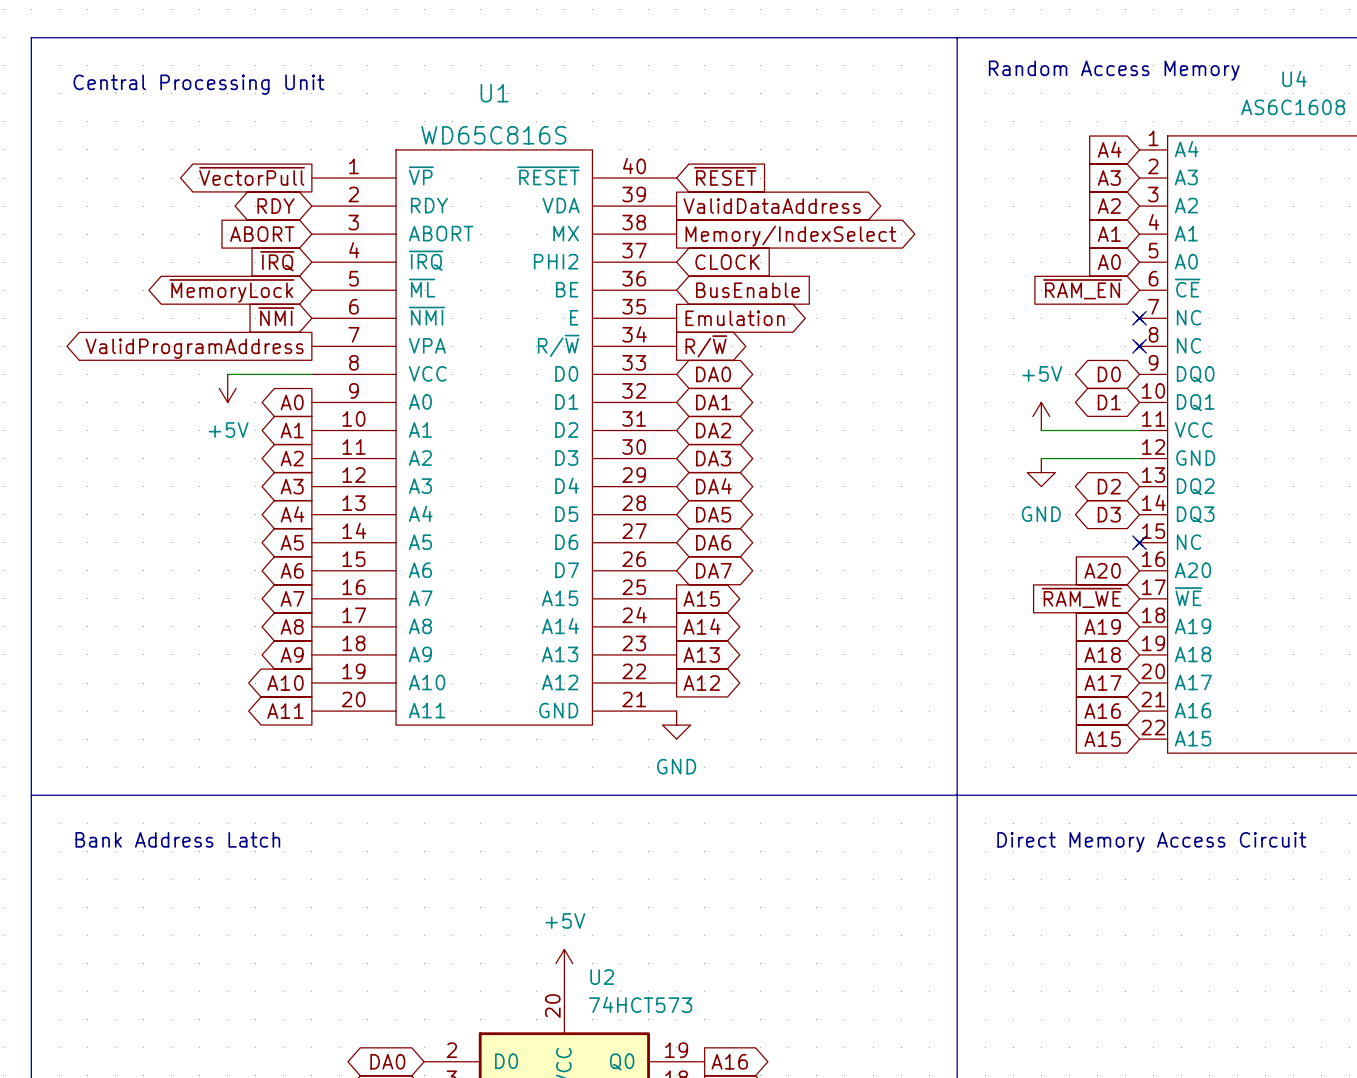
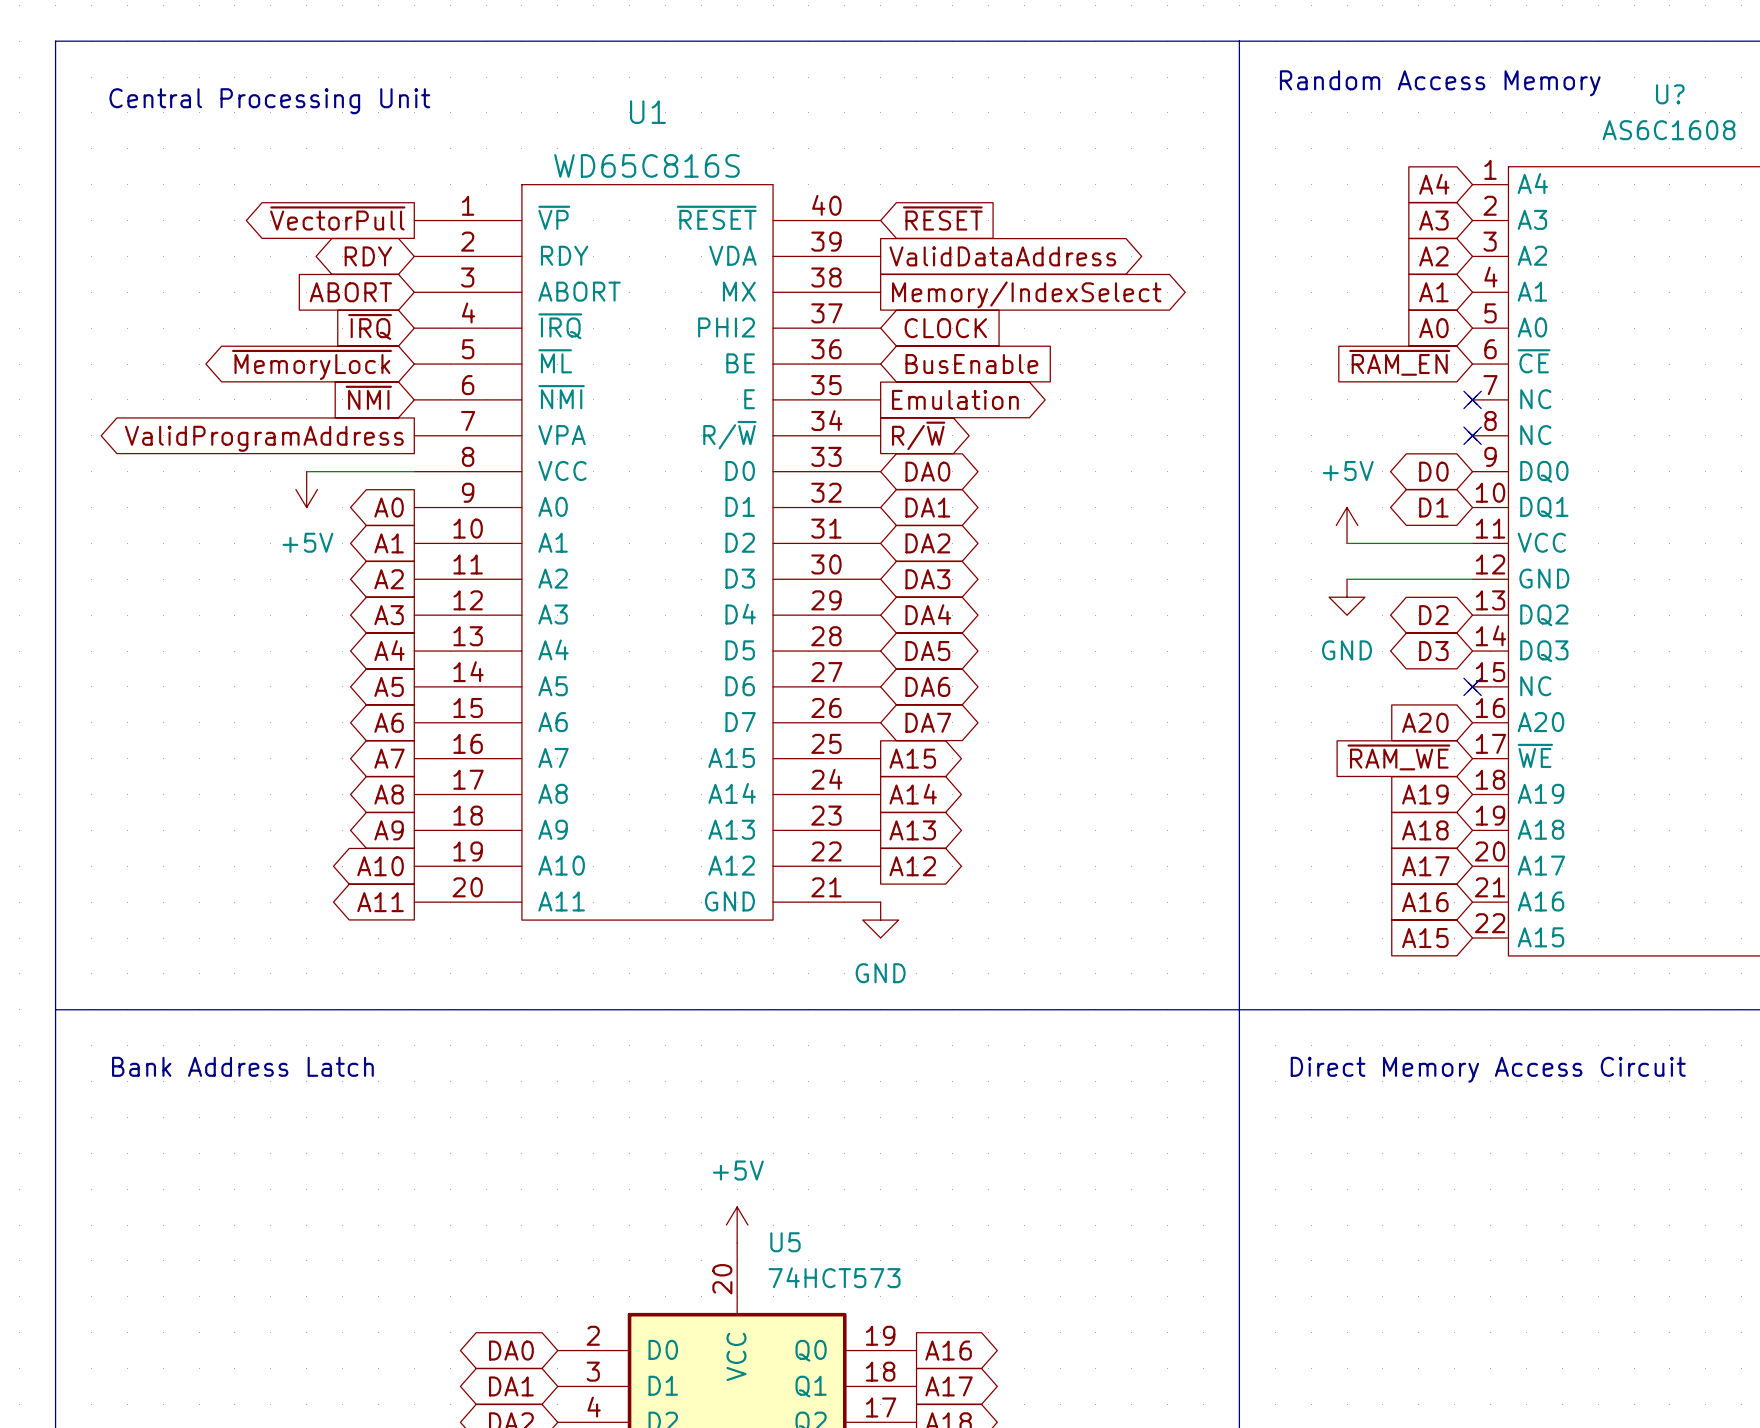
U4 name: U4 (1294, 78) -> U? (1670, 94)
U2 name: U2 (602, 977) -> U5 (785, 1242)

